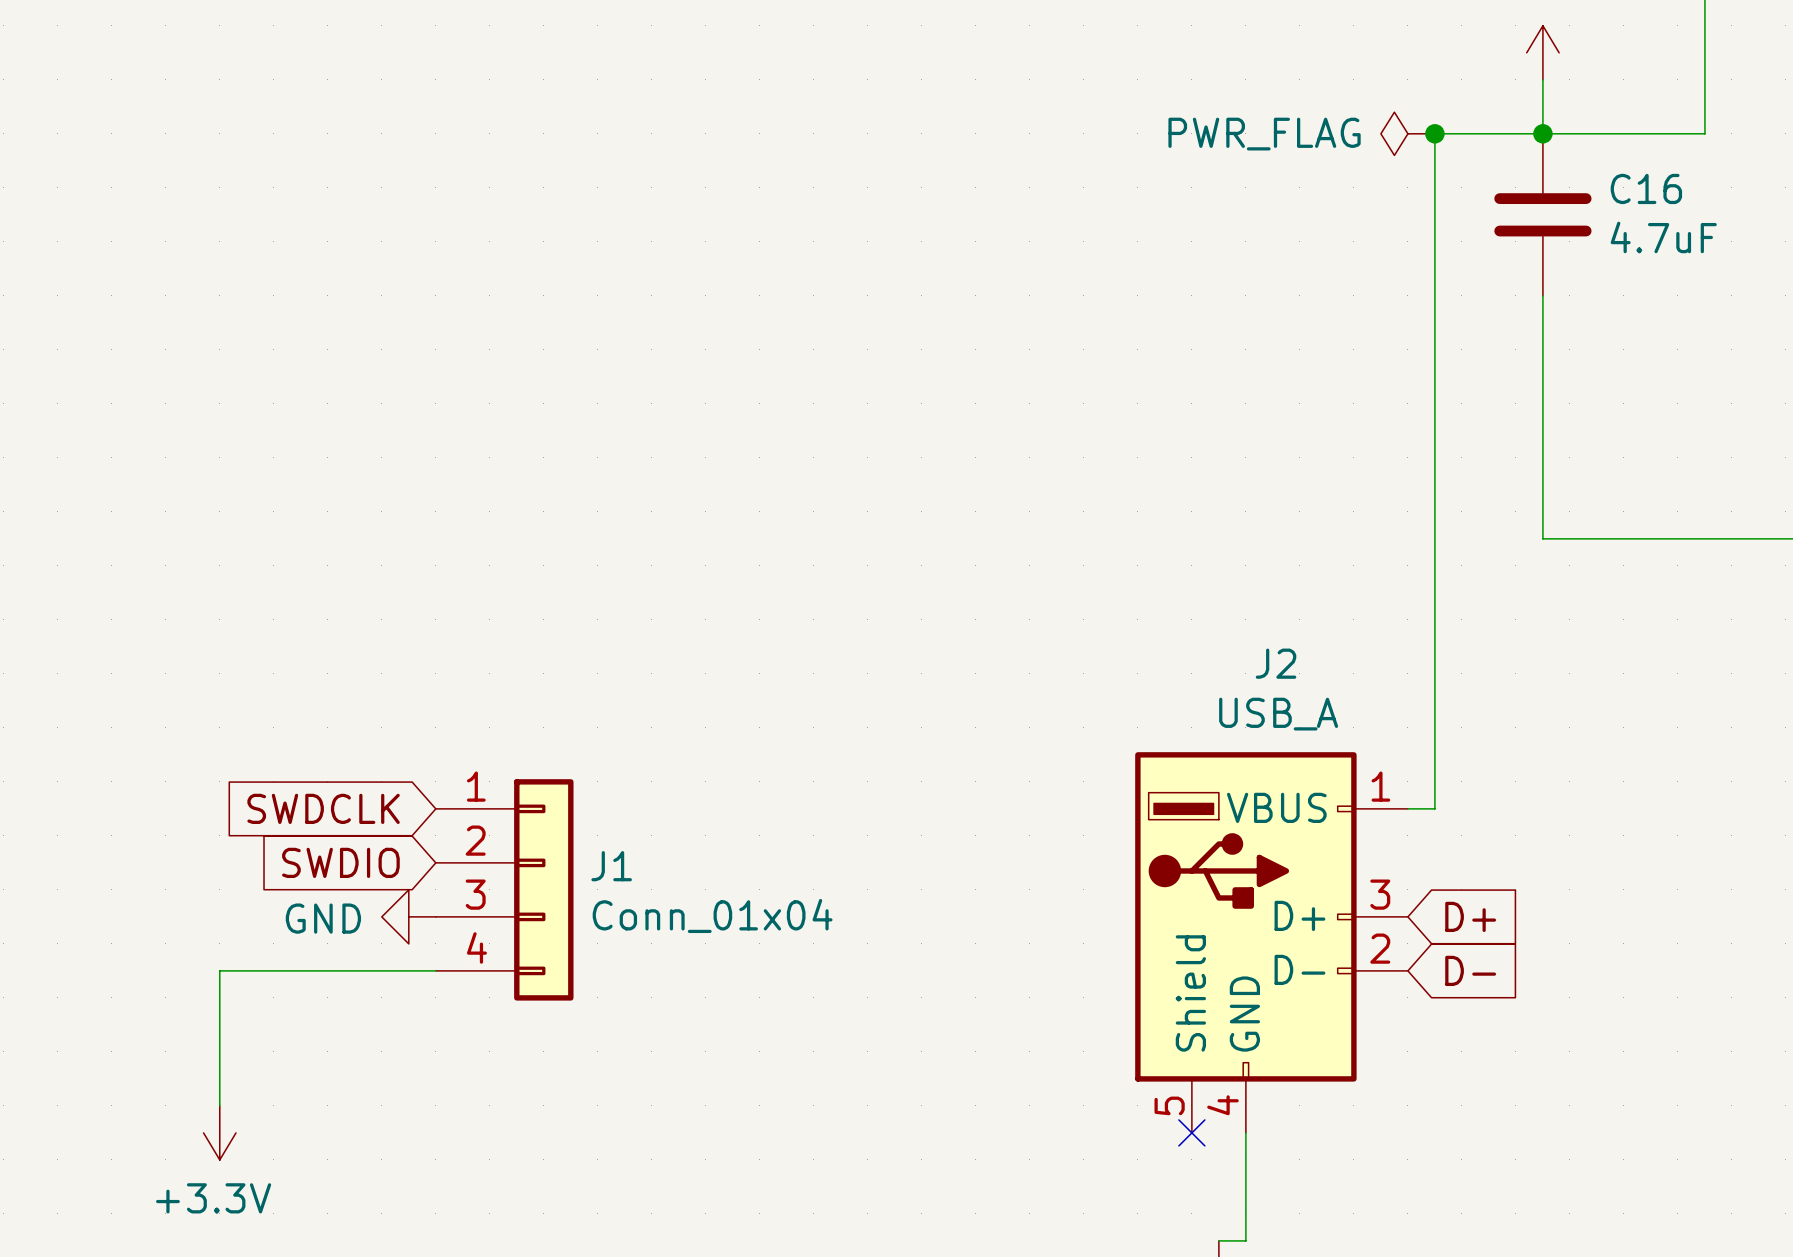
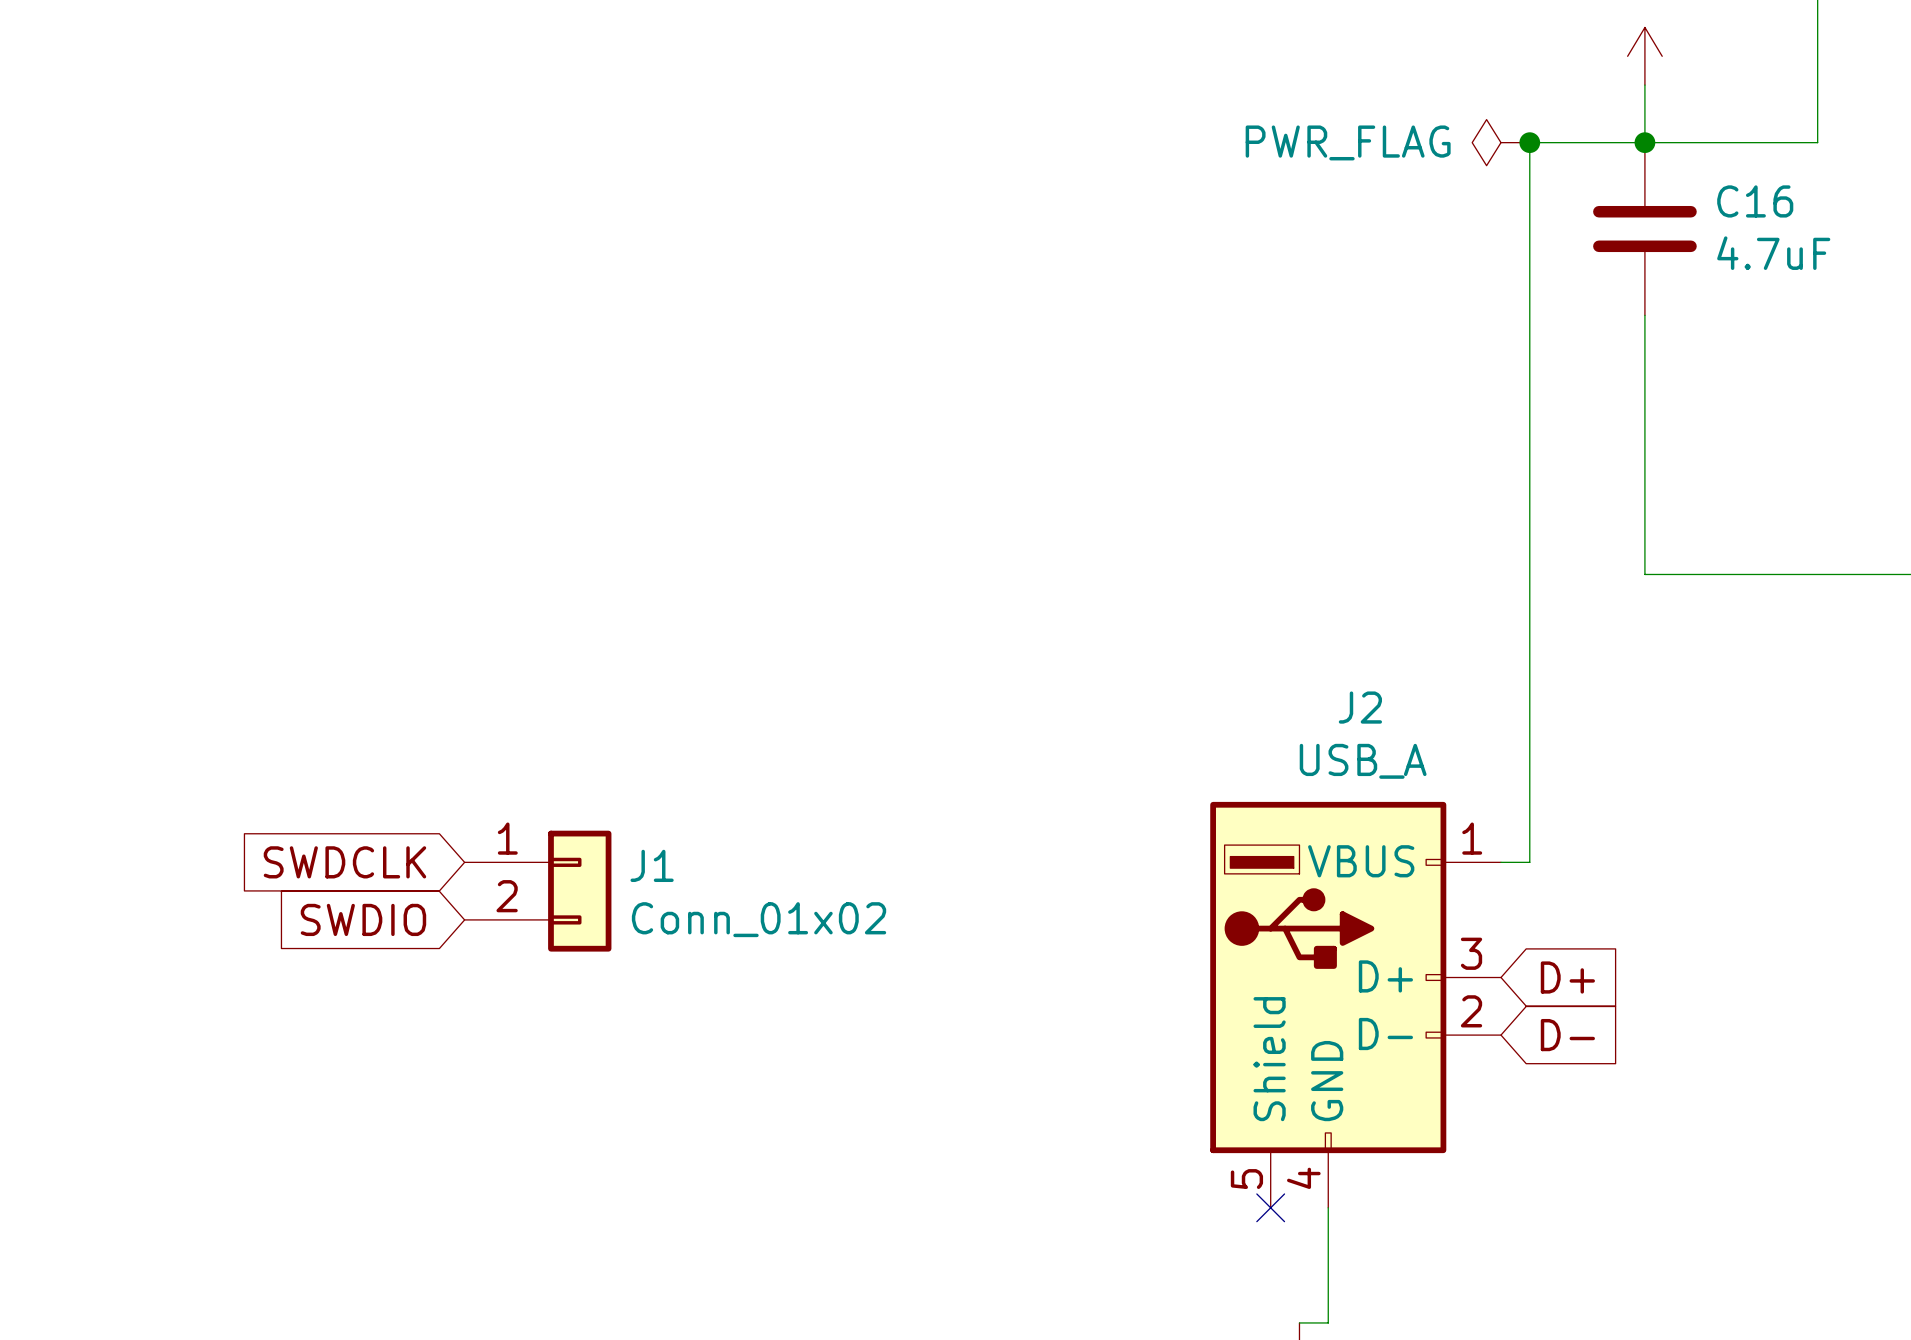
J1 symbol: [435, 779, 574, 1001] -> [464, 830, 612, 952]
J1 value: Conn_01x04 (712, 915) -> Conn_01x02 (759, 919)
power symbol: GND (408, 916) -> none
wire: (435, 970) (219, 970) (219, 1105) -> none
power symbol: +3.3V (219, 1132) -> none

